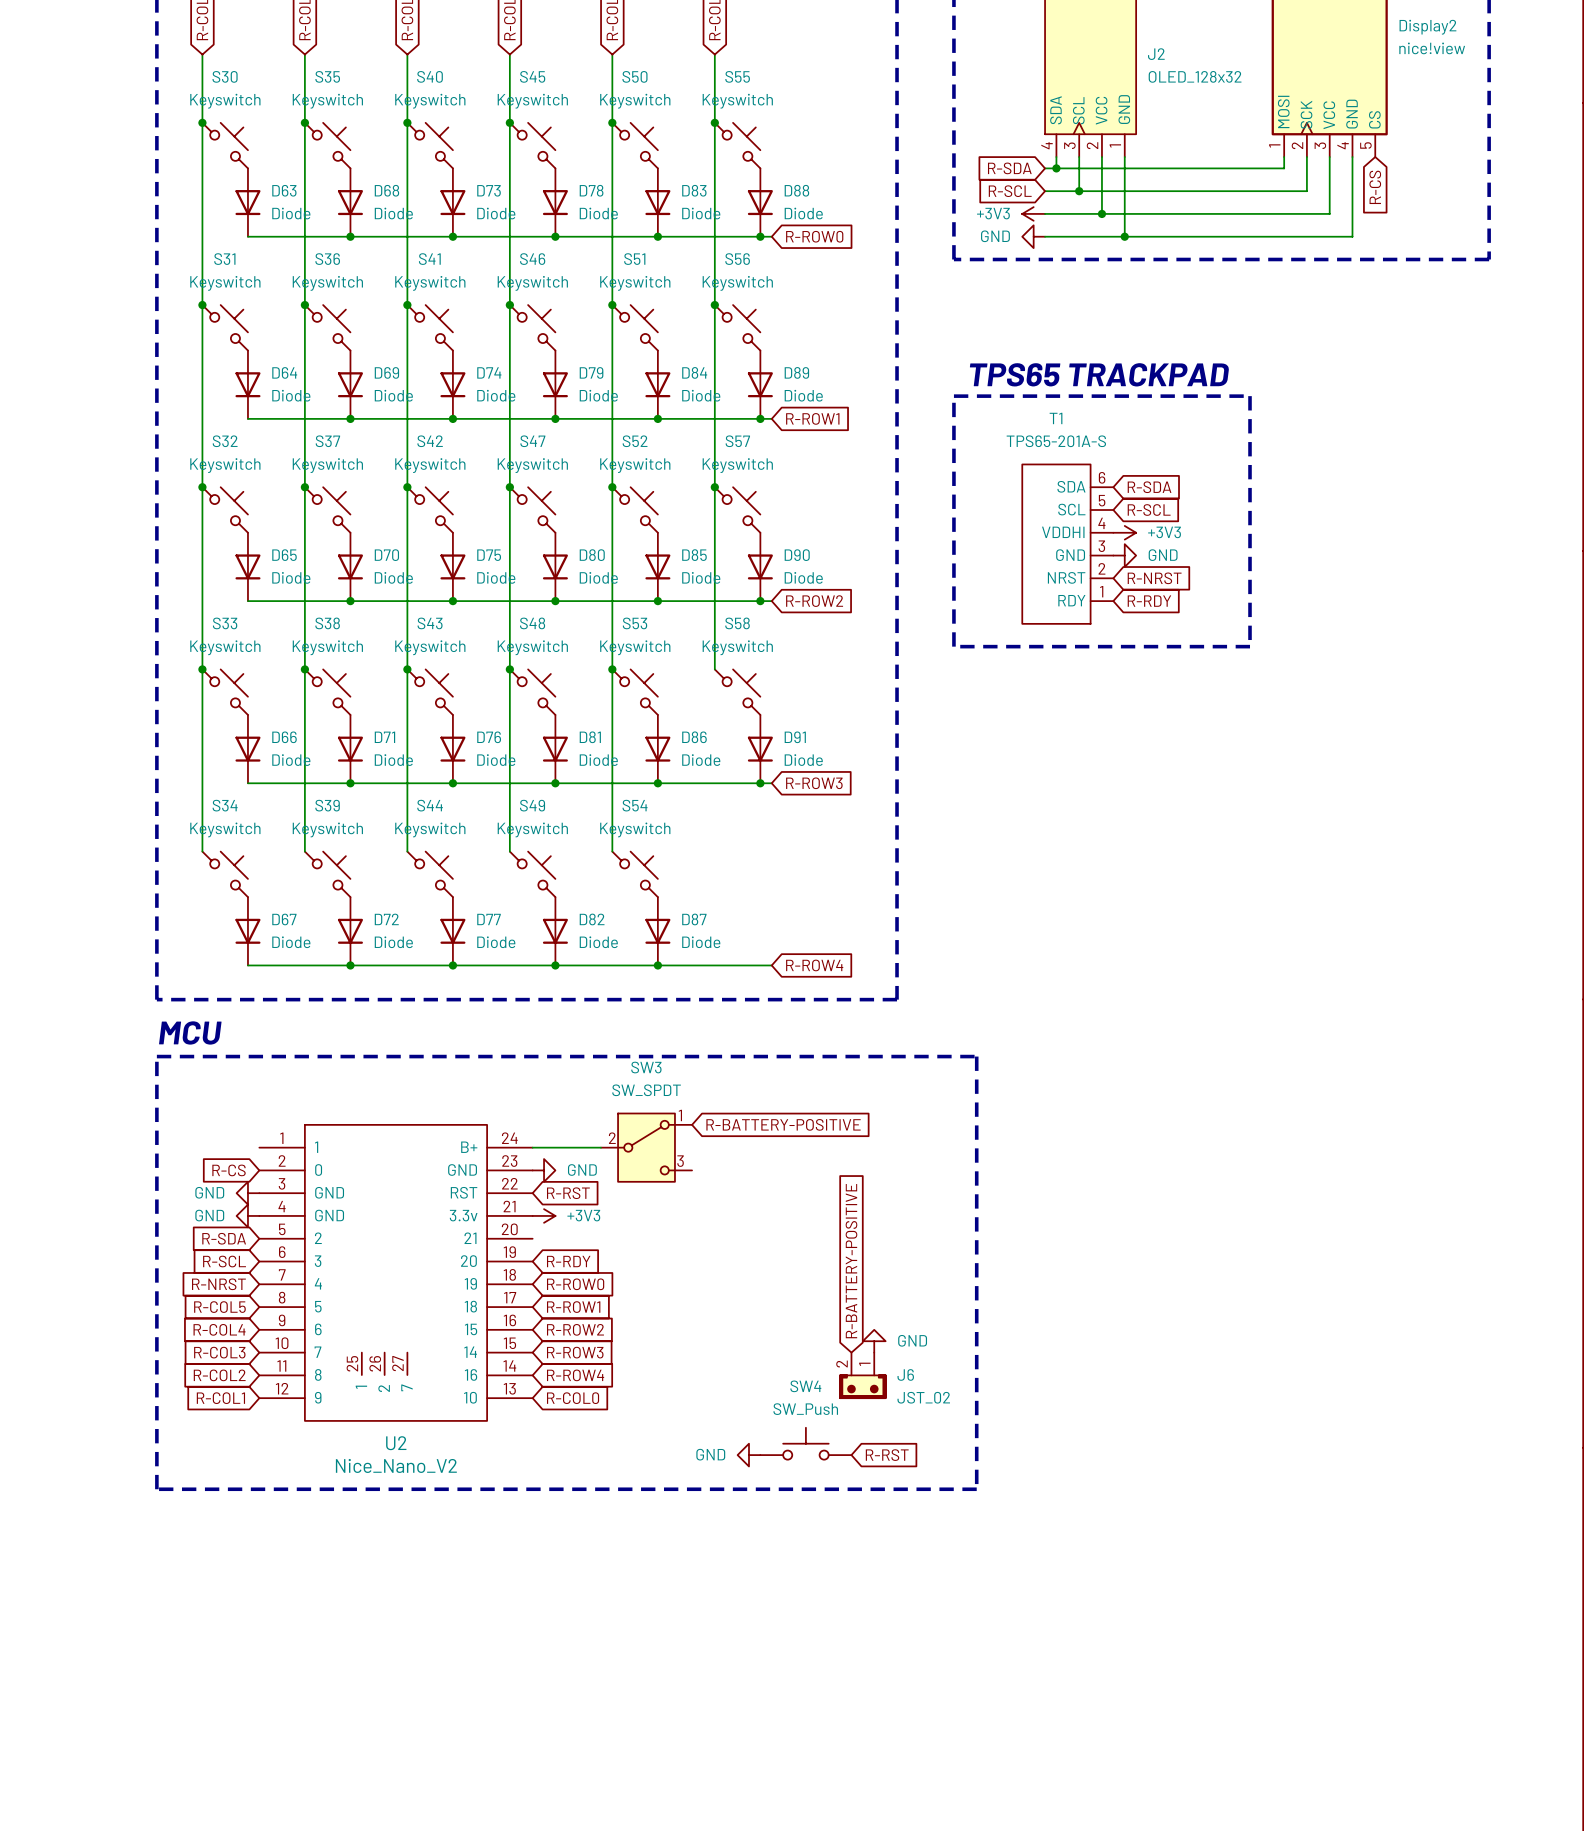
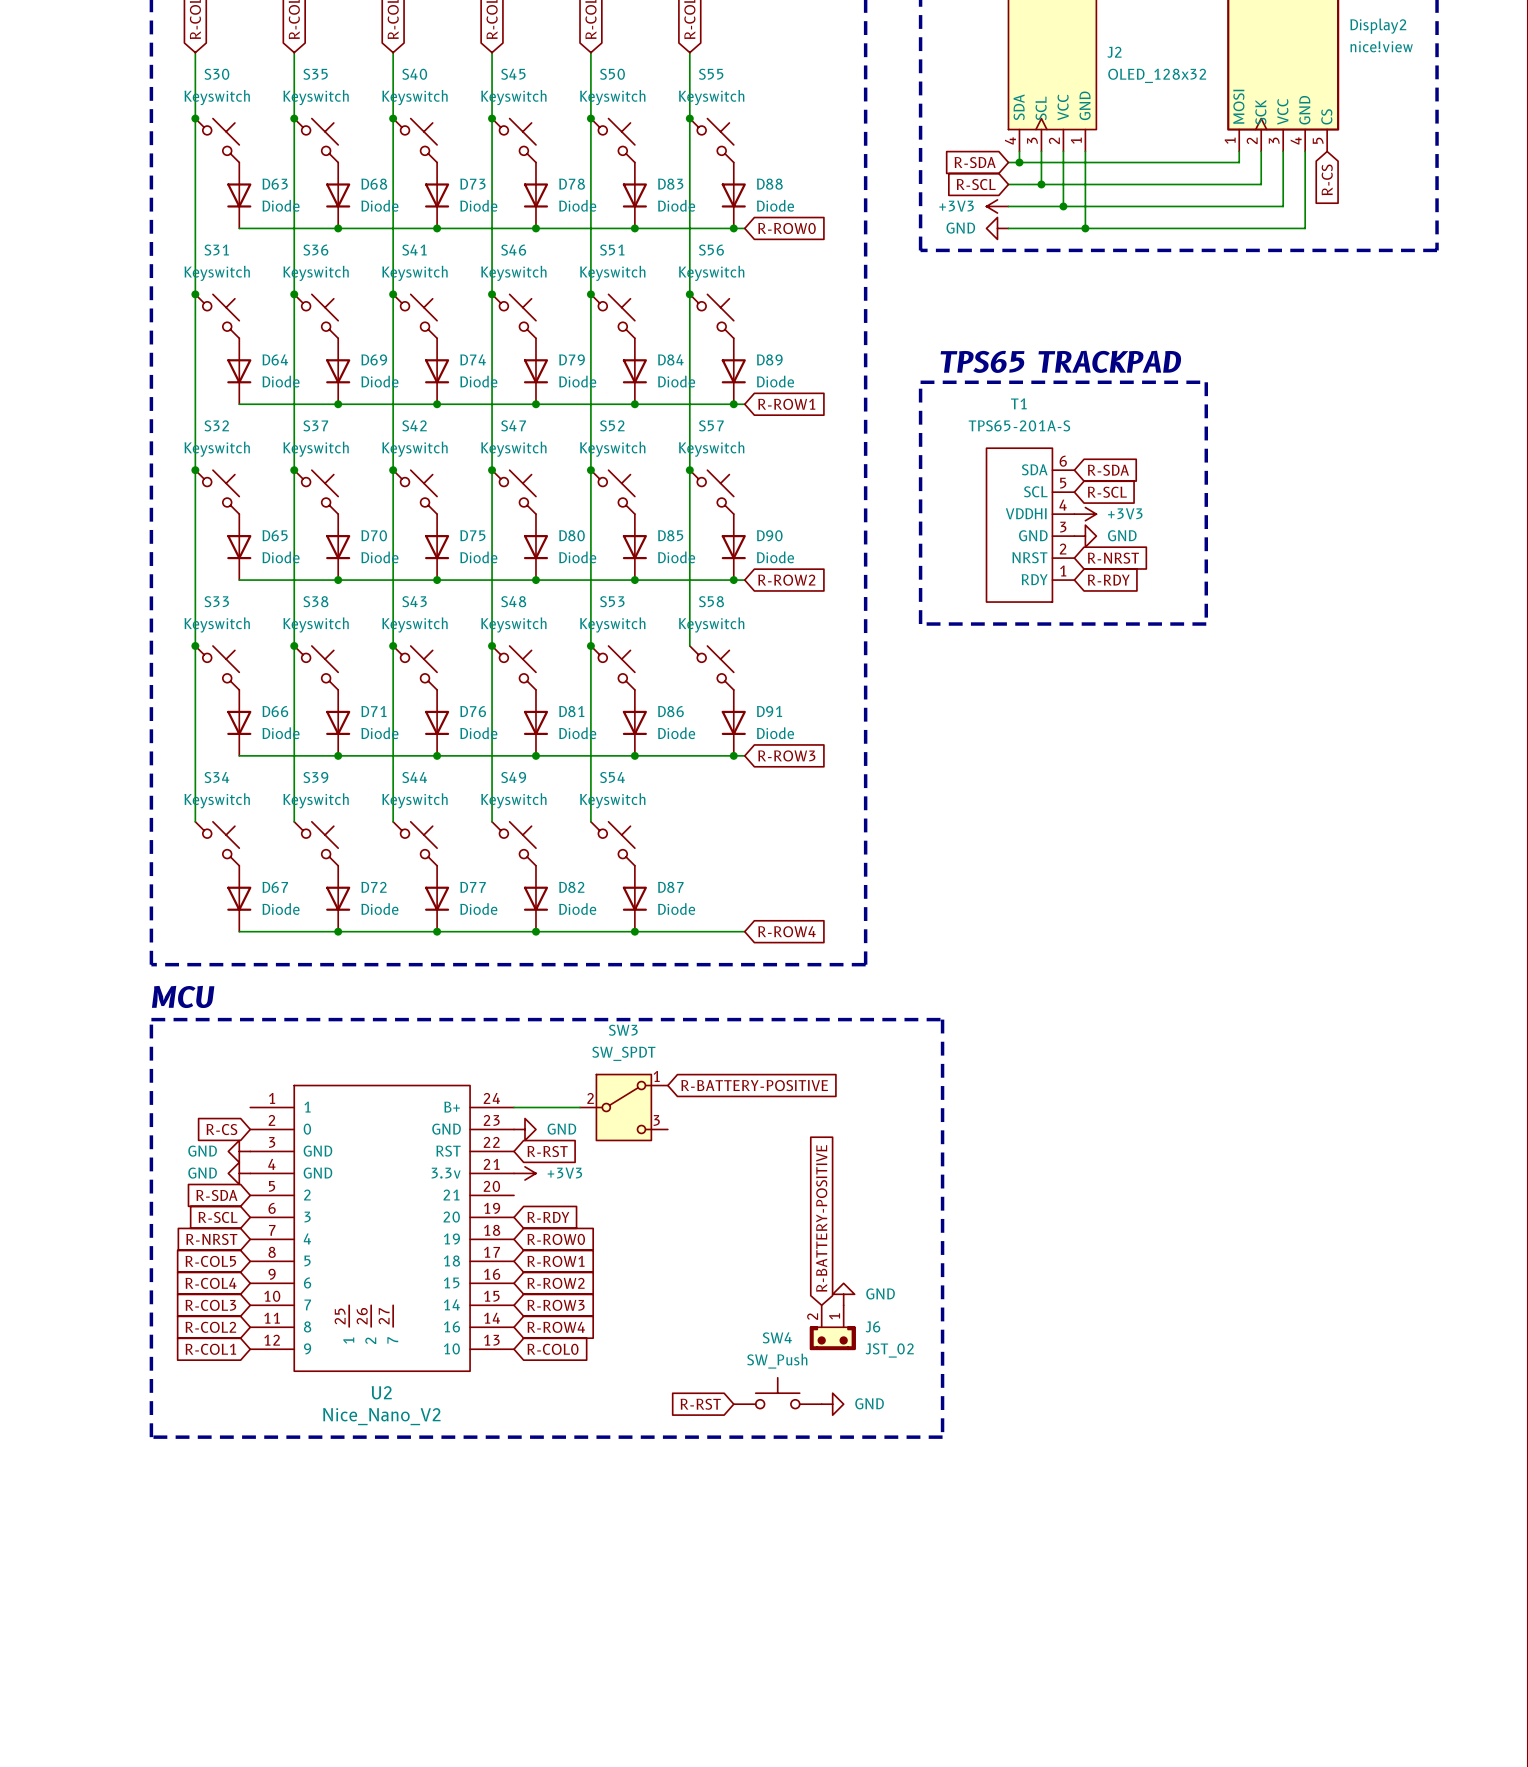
power symbol rotation: 0° (748, 1455) -> 180° (832, 1404)
power symbol position: GND (748, 1455) -> GND (832, 1404)
global label rotation: 0° (887, 1455) -> 180° (700, 1404)
global label position: R-RST (887, 1455) -> R-RST (700, 1404)

